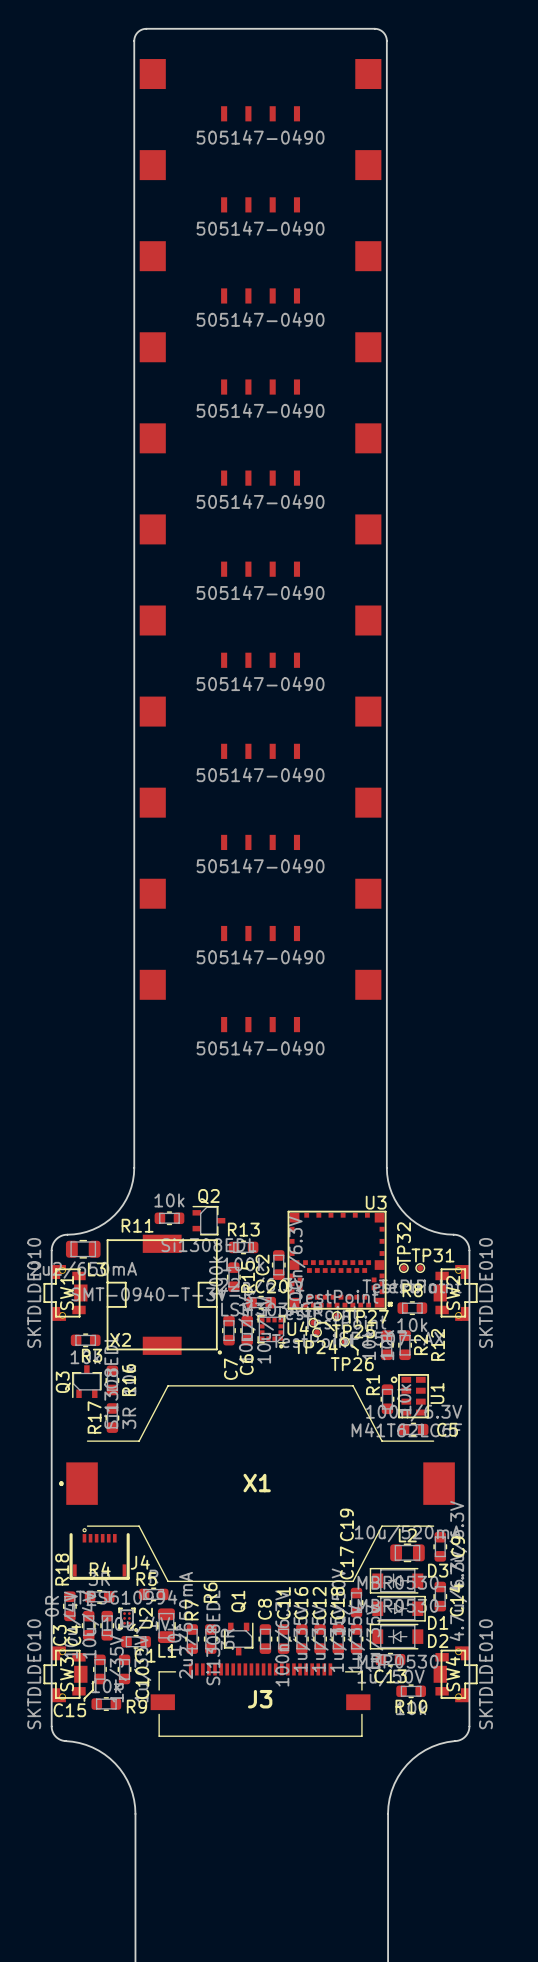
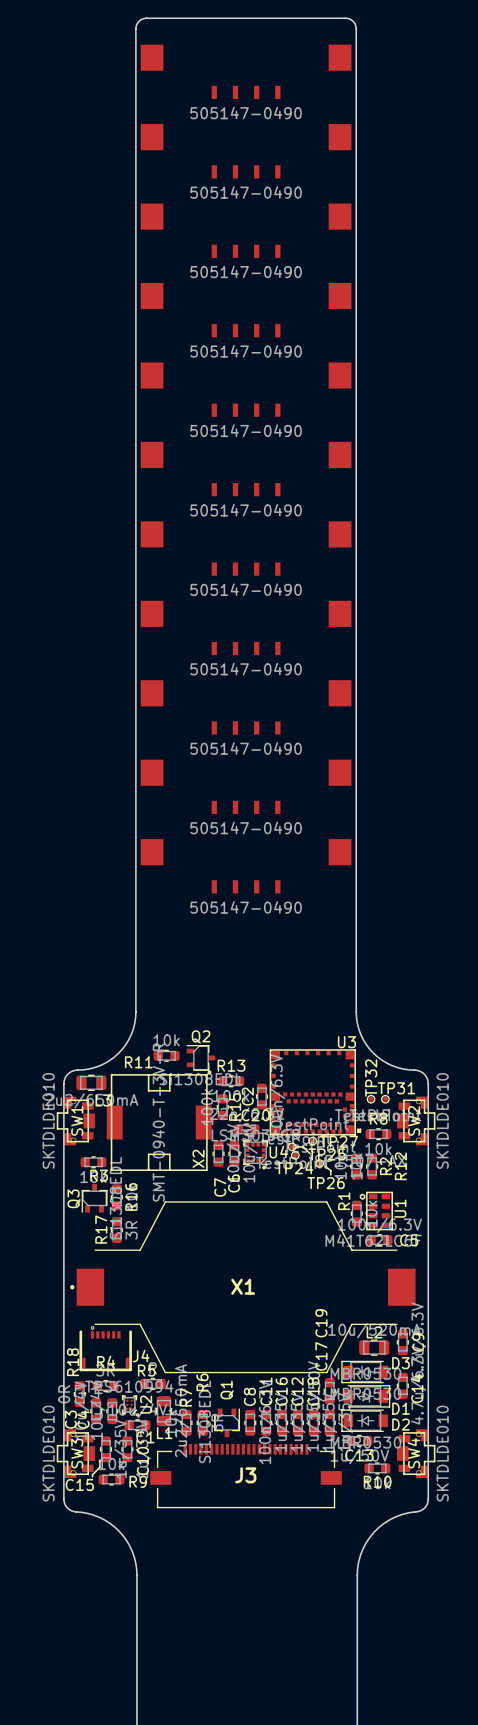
X2 rotation: 0° (164, 1294) -> 90° counterclockwise (159, 1120)

